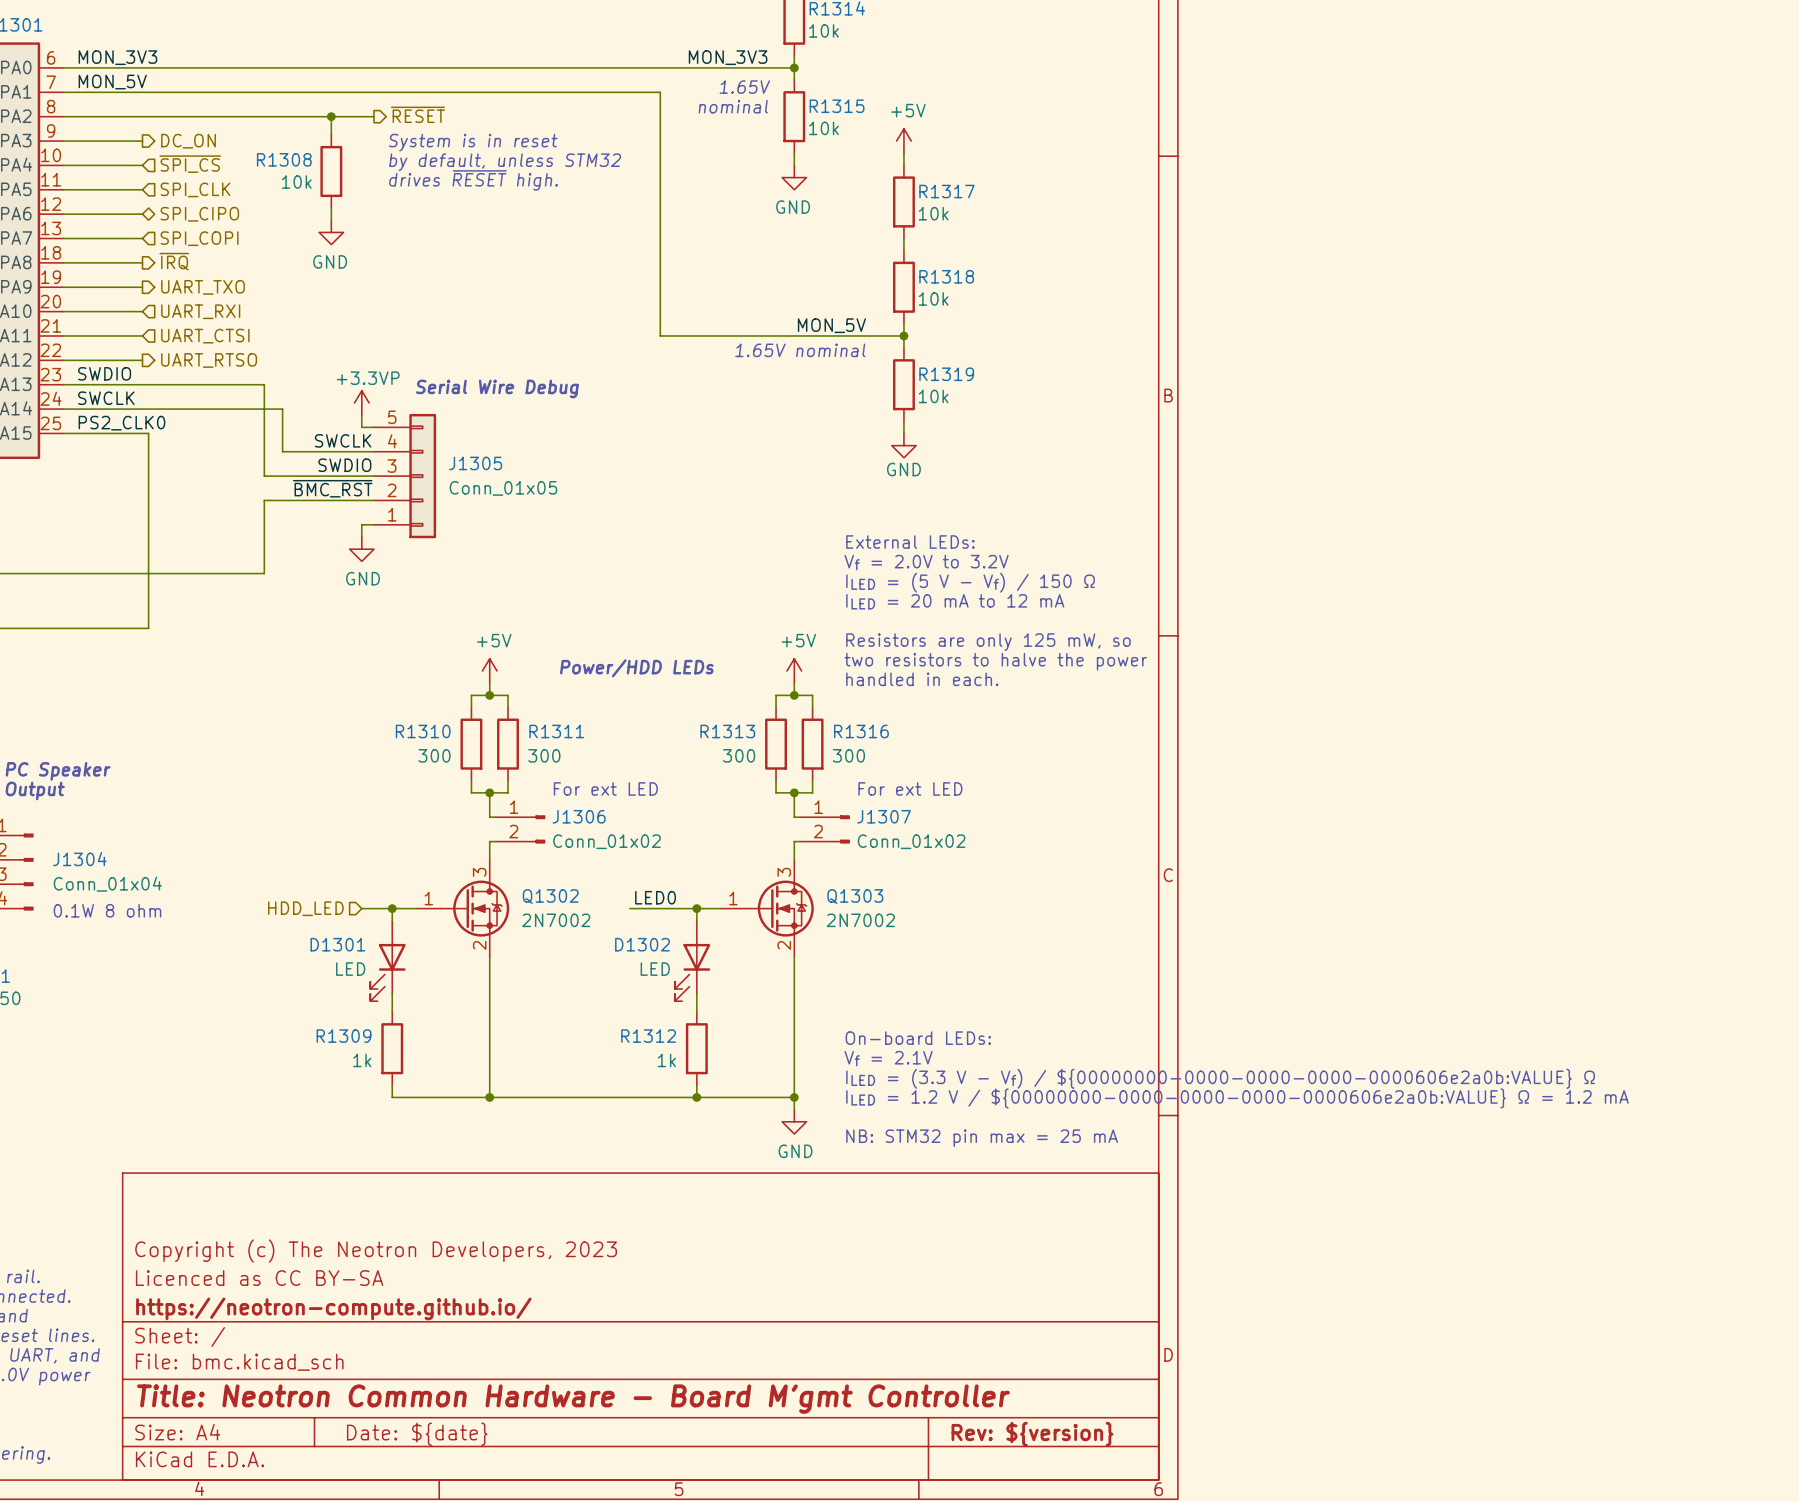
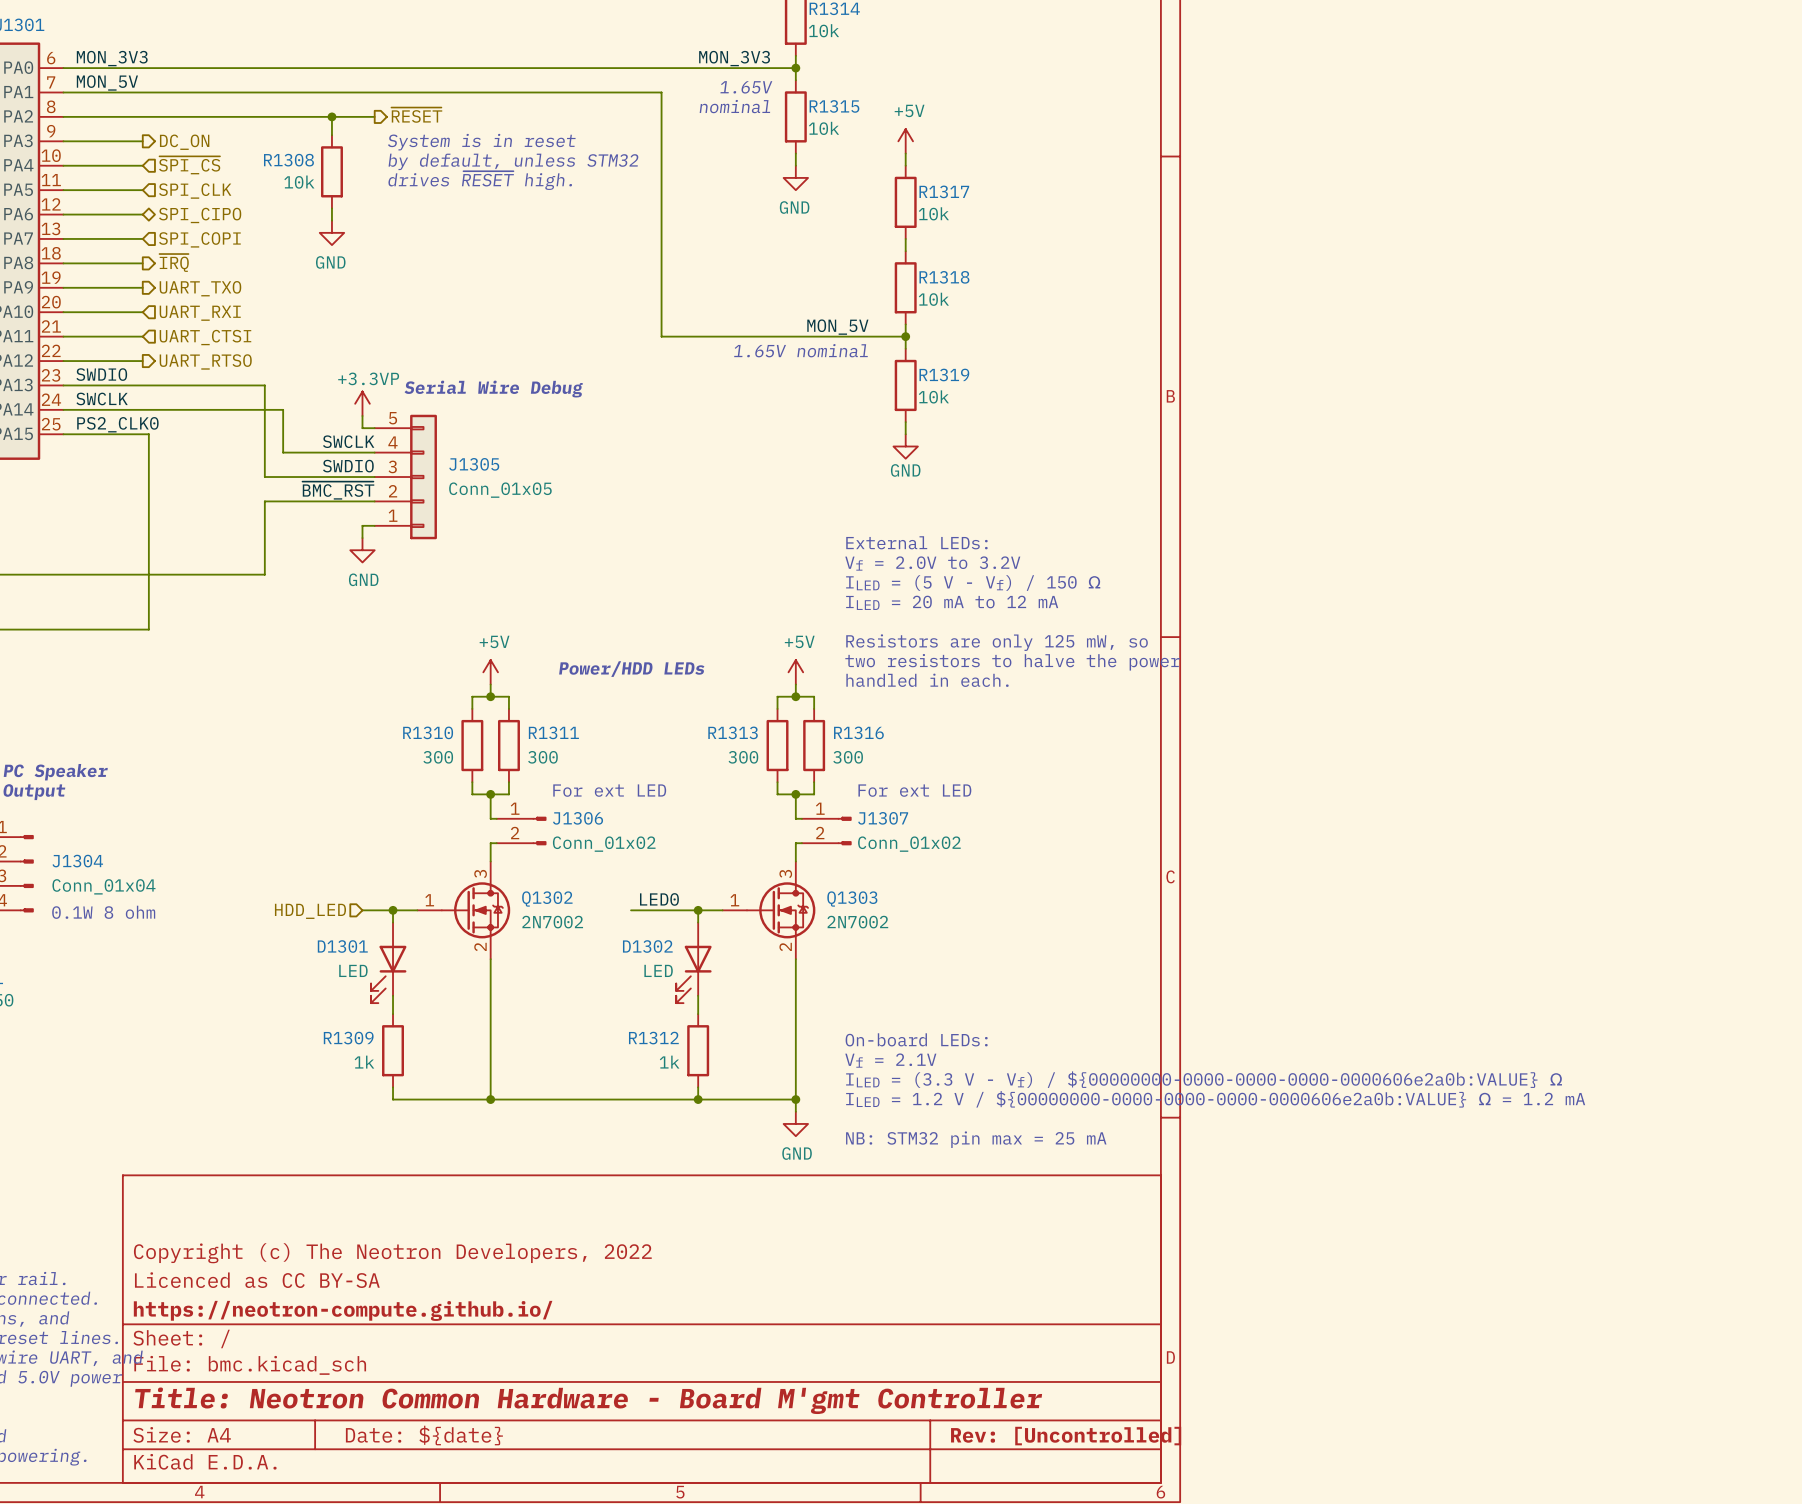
title block: Copyright (c) The Neotron Developers, 2023 (376, 1251) -> Copyright (c) The Neotron Developers, 2022 (392, 1253)
title block: Rev: ${version} (1032, 1434) -> Rev: [Uncontrolled] (1066, 1436)

